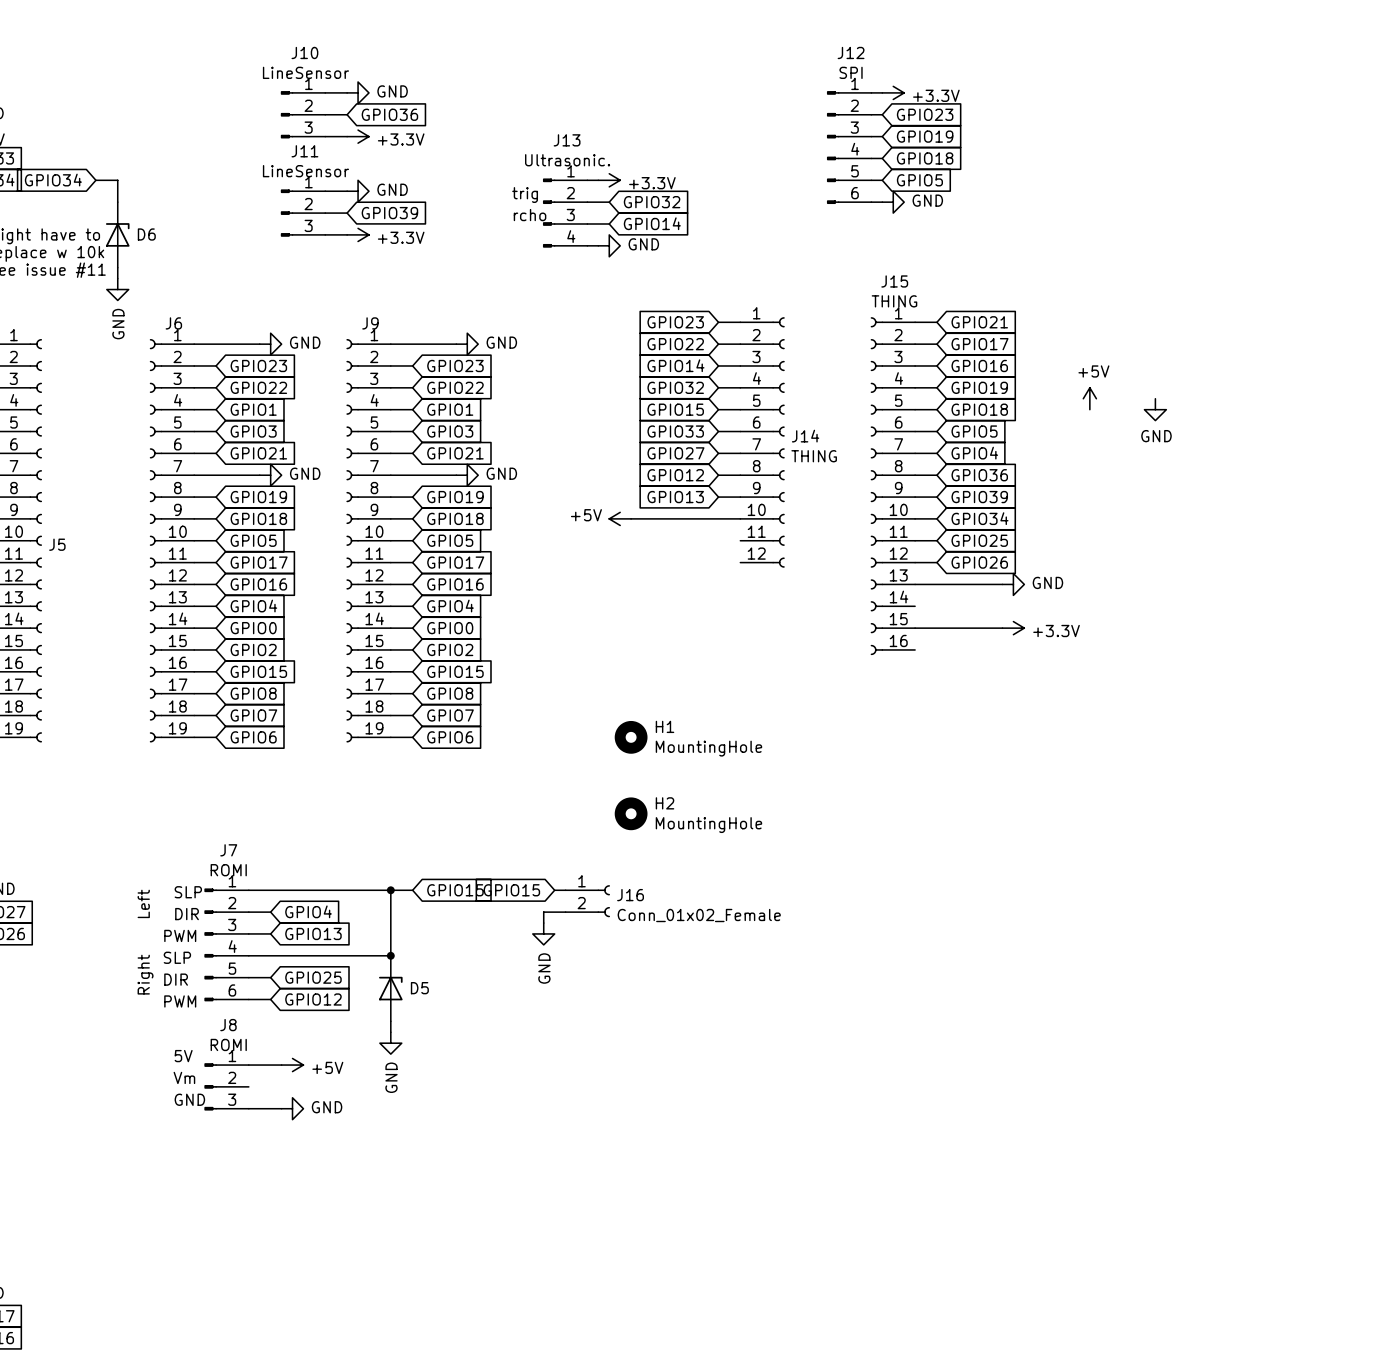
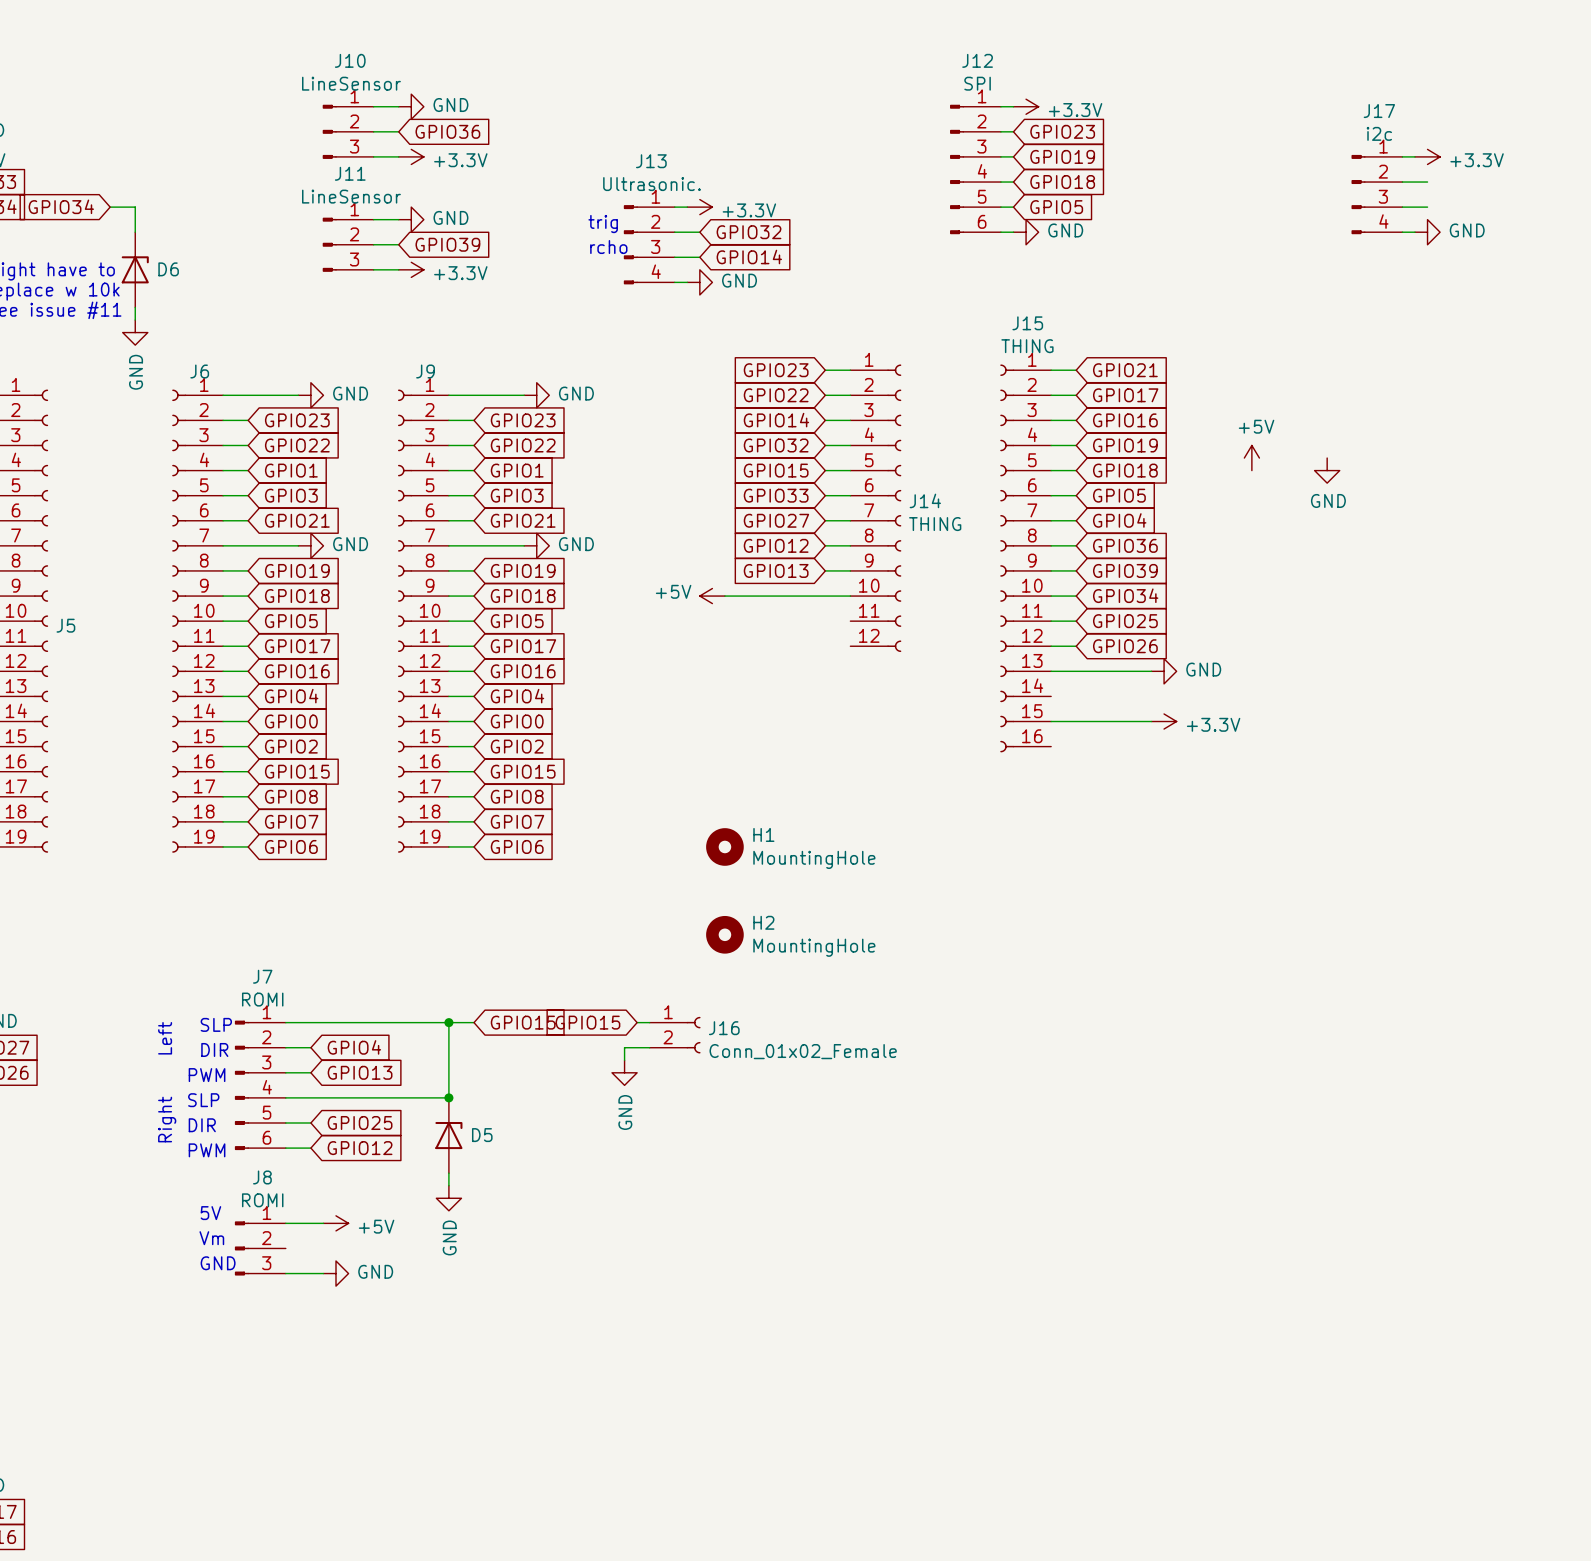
wire: none -> (1402, 156) (1414, 156)
power symbol: none -> +3.3V (1427, 156)
wire: none -> (1402, 182) (1427, 182)
J17: none -> i2c (1376, 194)
wire: none -> (1402, 207) (1427, 207)
wire: none -> (1402, 232) (1414, 232)
power symbol: none -> GND (1427, 232)

